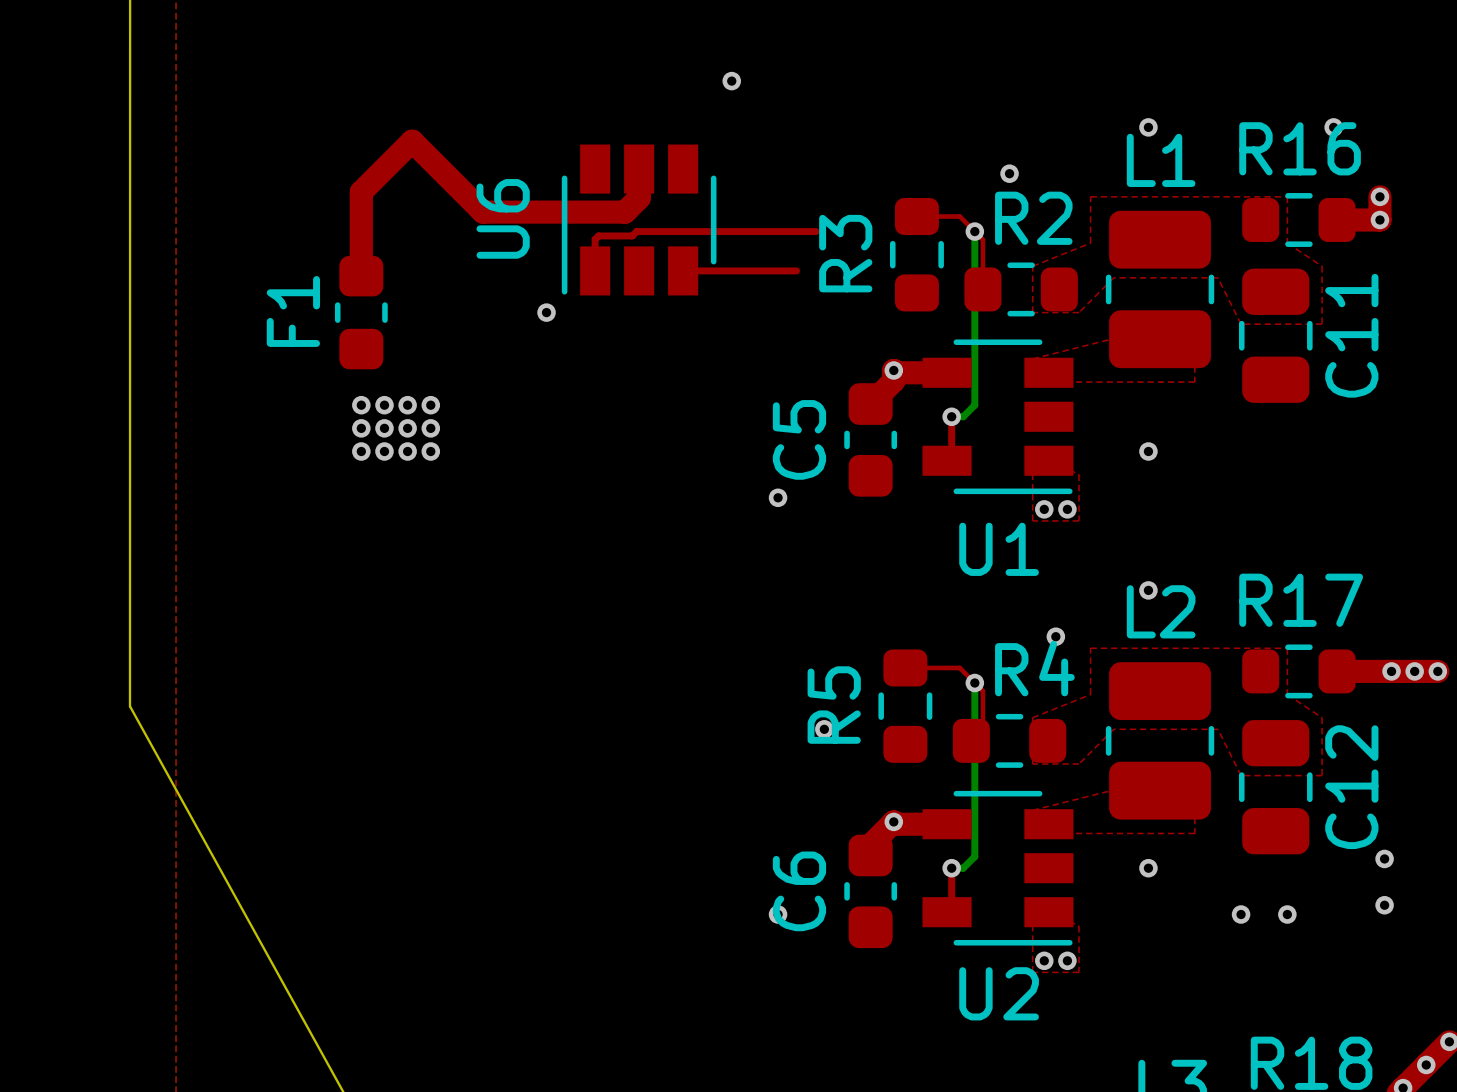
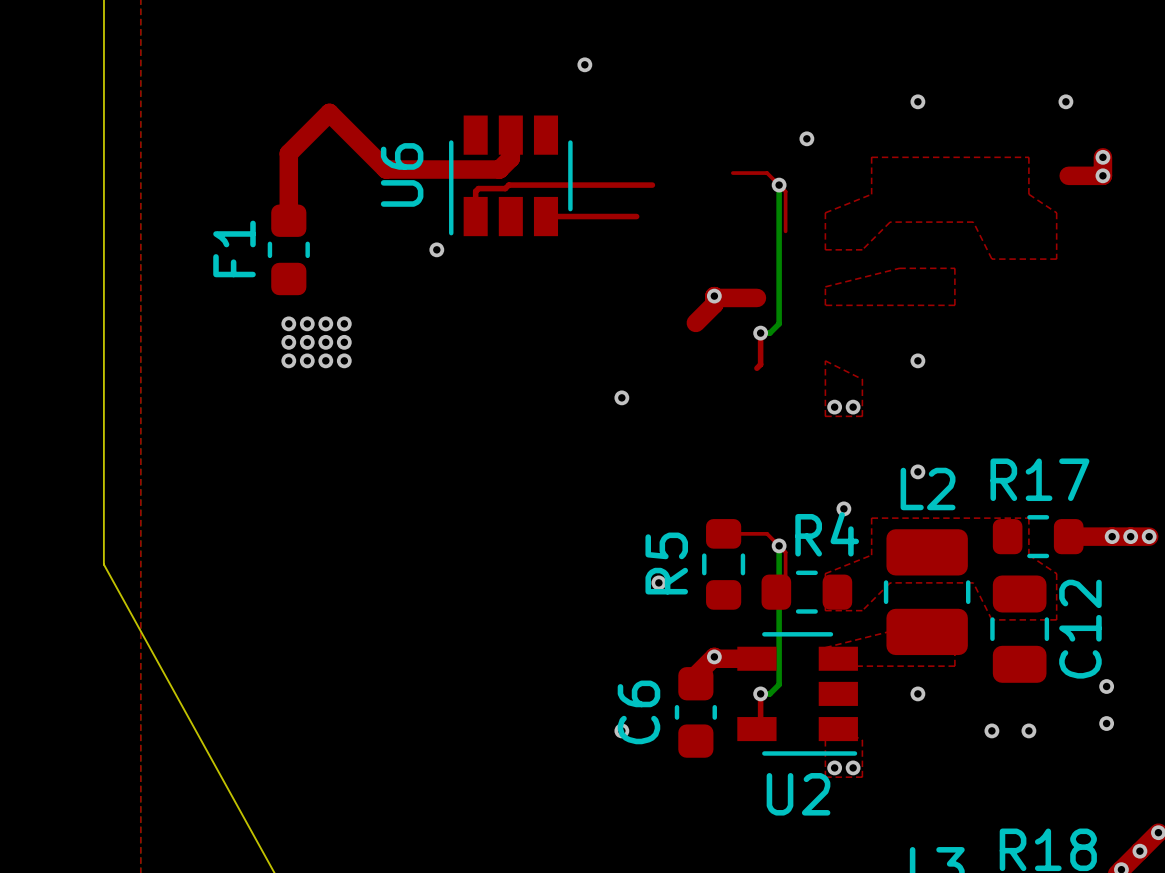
R16: (1298, 219) -> none
R3: (916, 254) -> none
R2: (1021, 289) -> none
L1: (1160, 289) -> none
C11: (1275, 335) -> none
U1: (997, 416) -> none
C5: (870, 439) -> none

